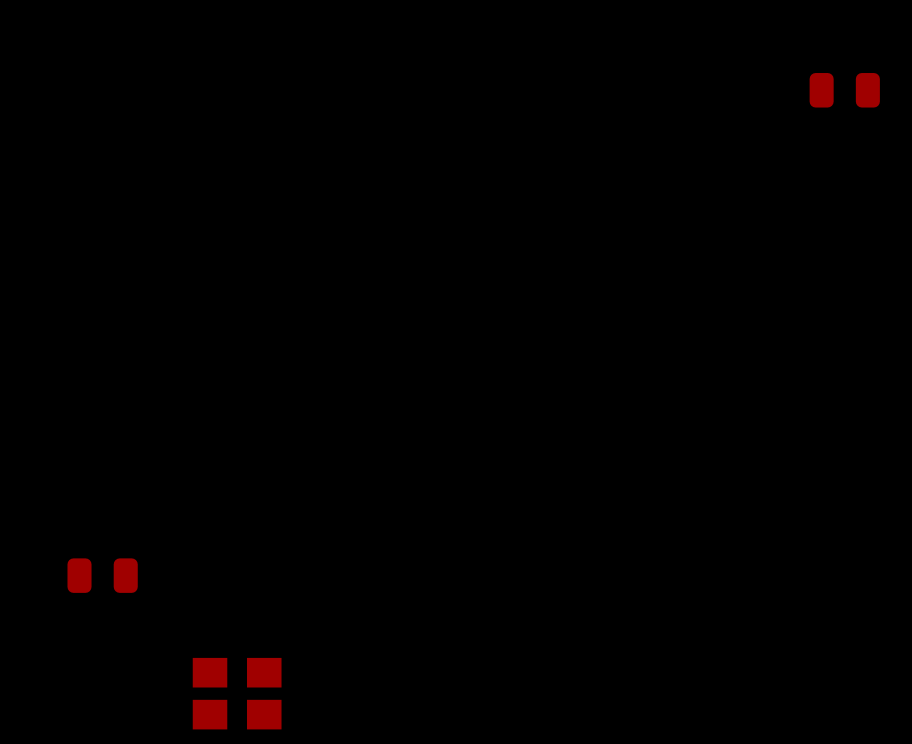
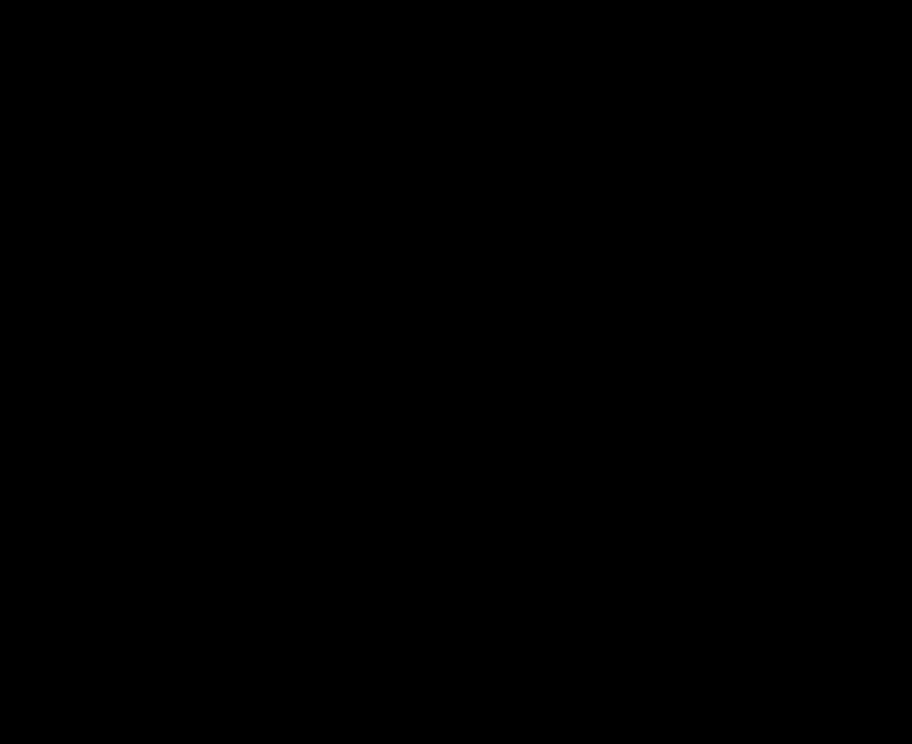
part: (844, 90) -> none
part: (102, 575) -> none
part: (237, 693) -> none

